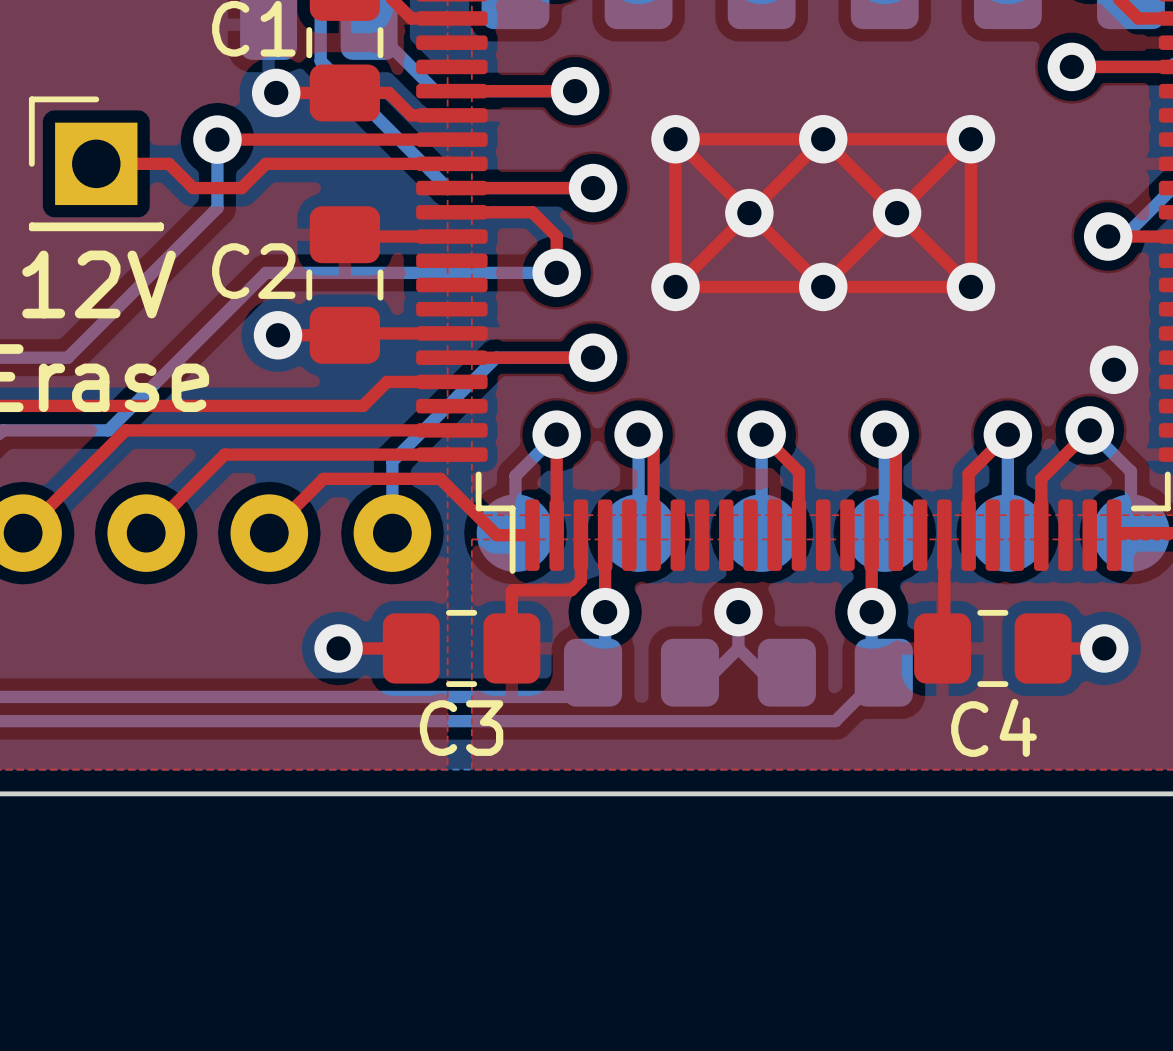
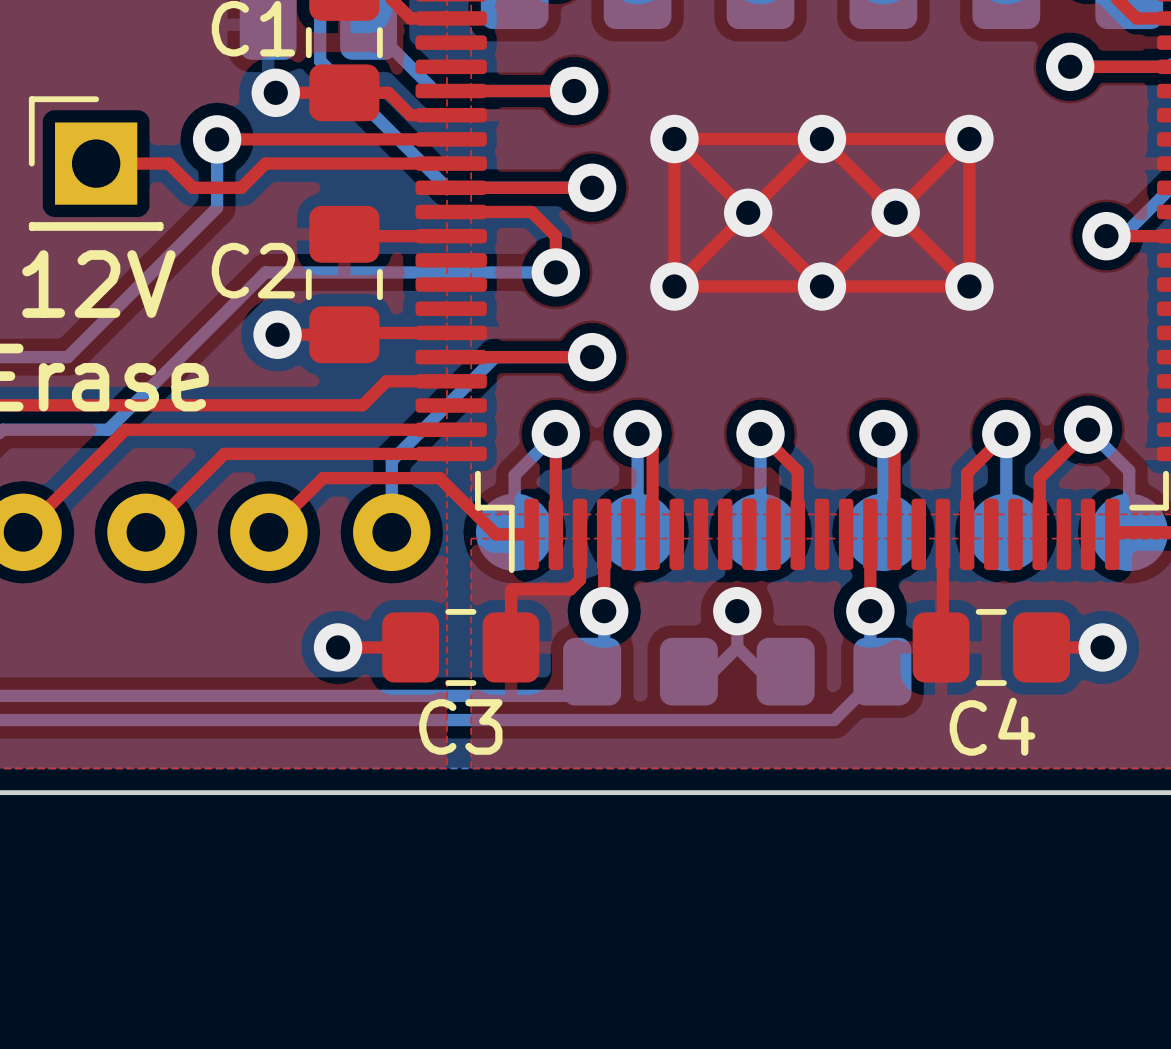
via: (1113, 369) -> none

